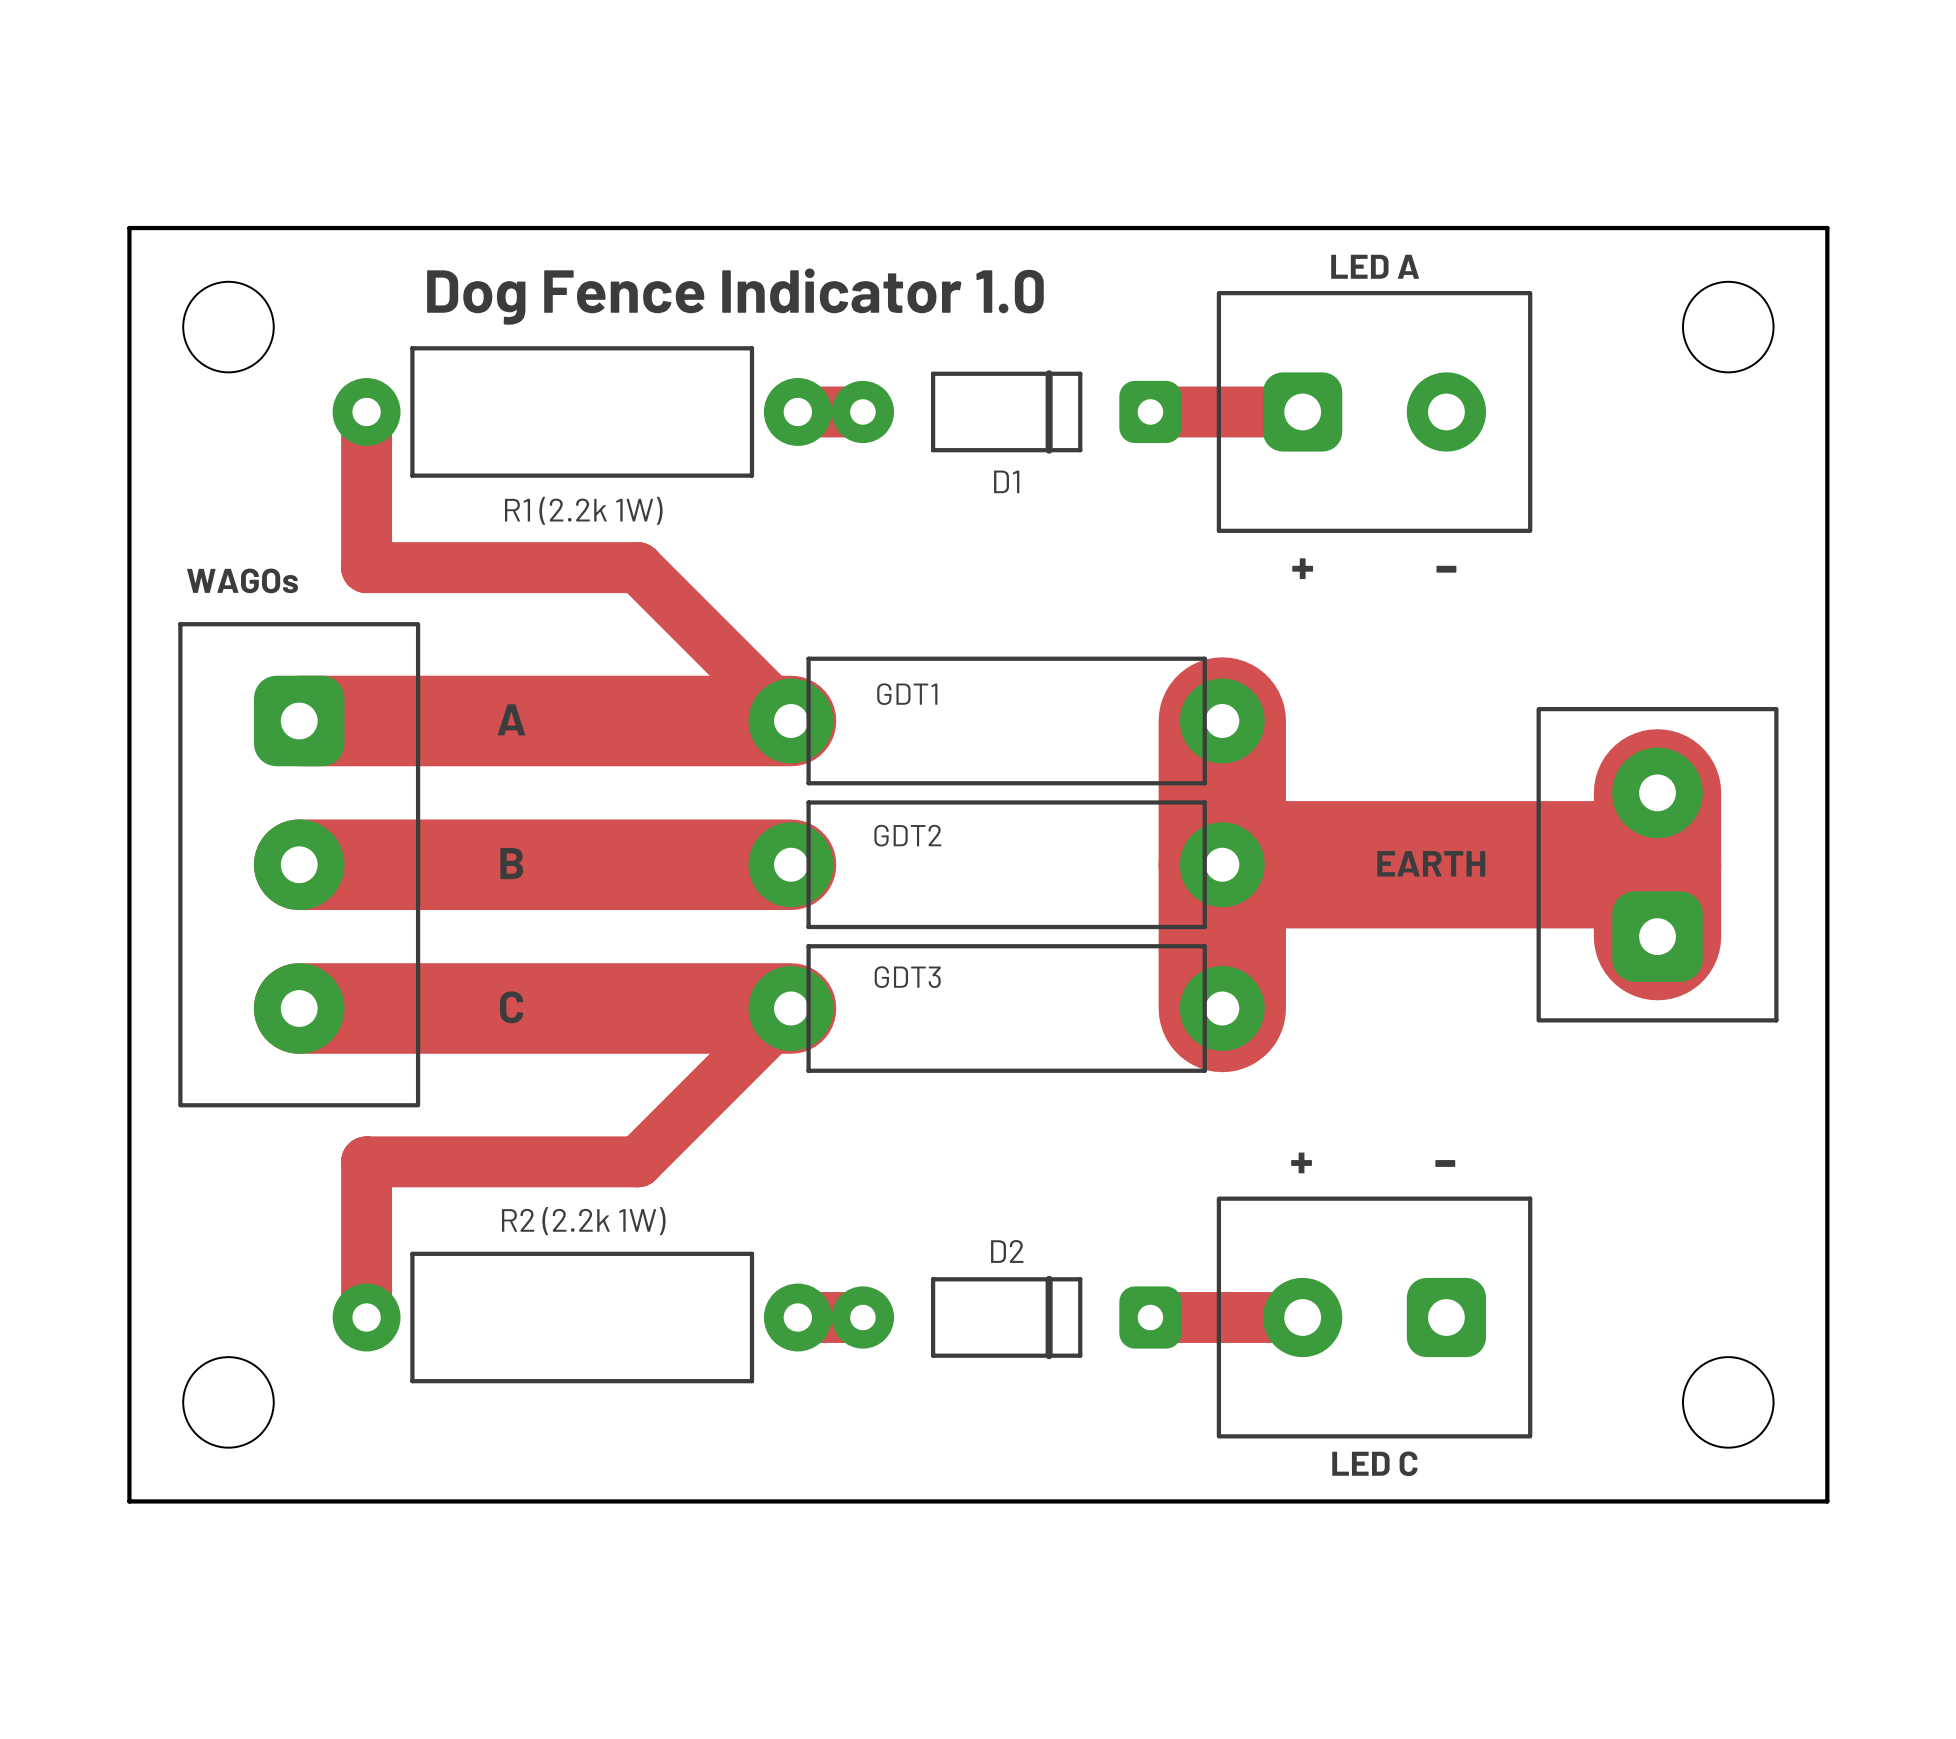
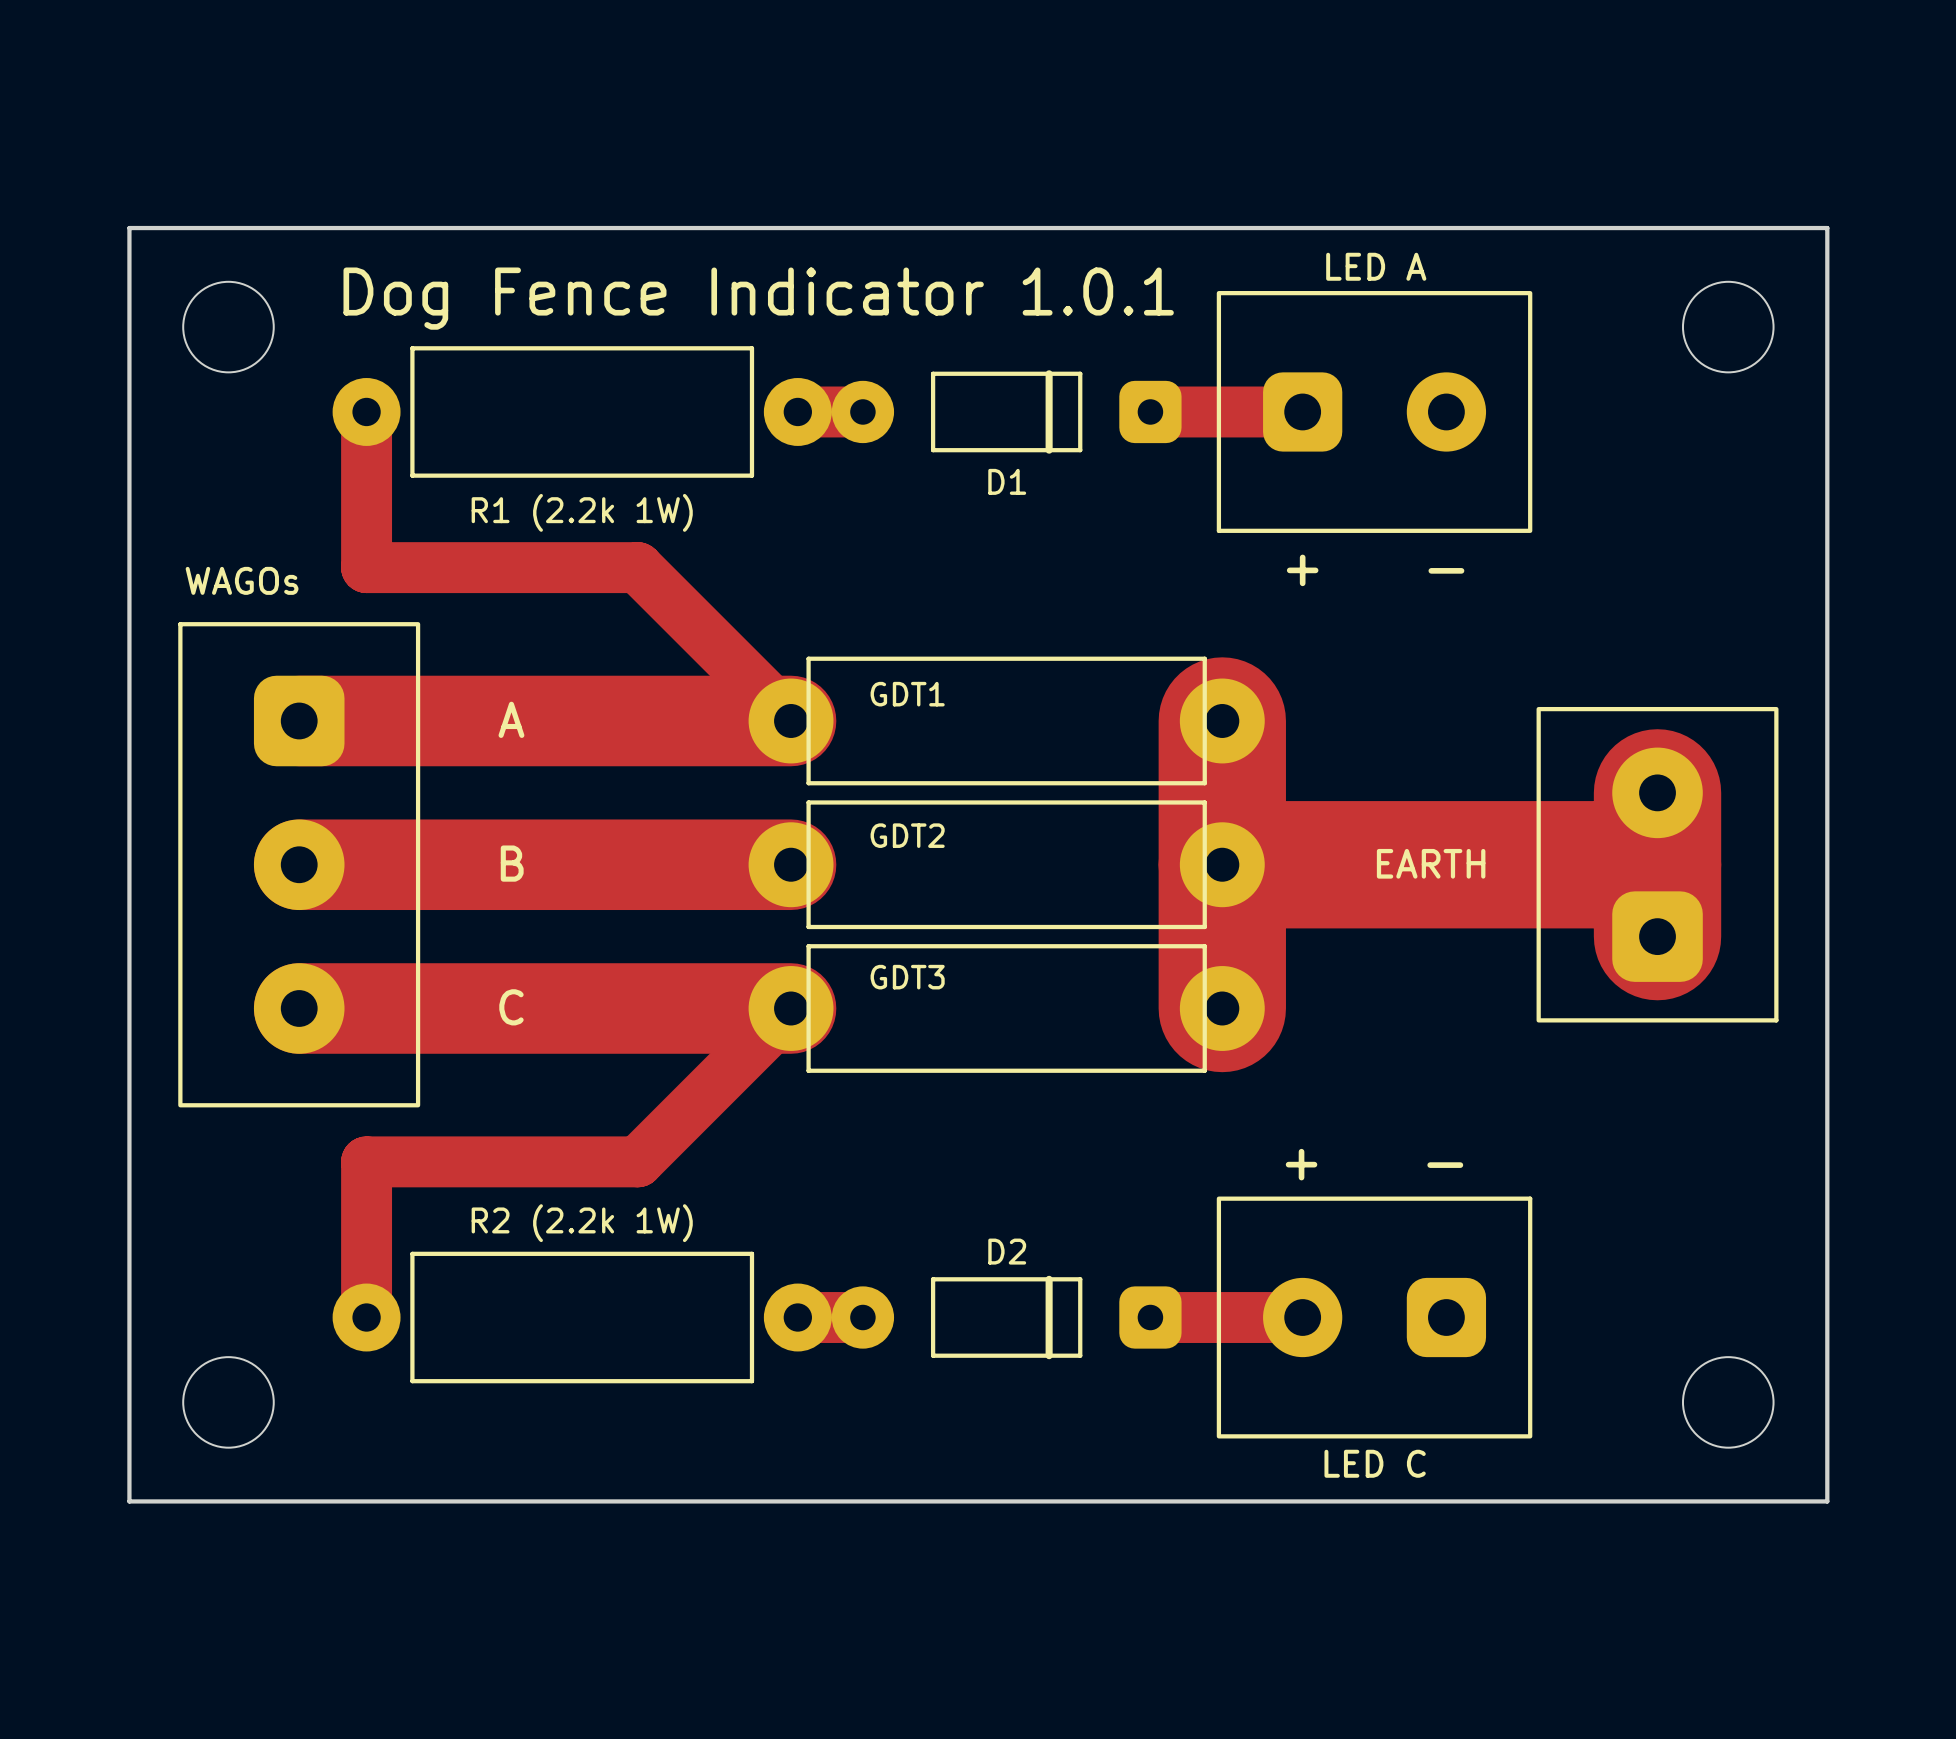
text: Dog Fence Indicator 1.0 (735, 296) -> Dog Fence Indicator 1.0.1 (758, 298)

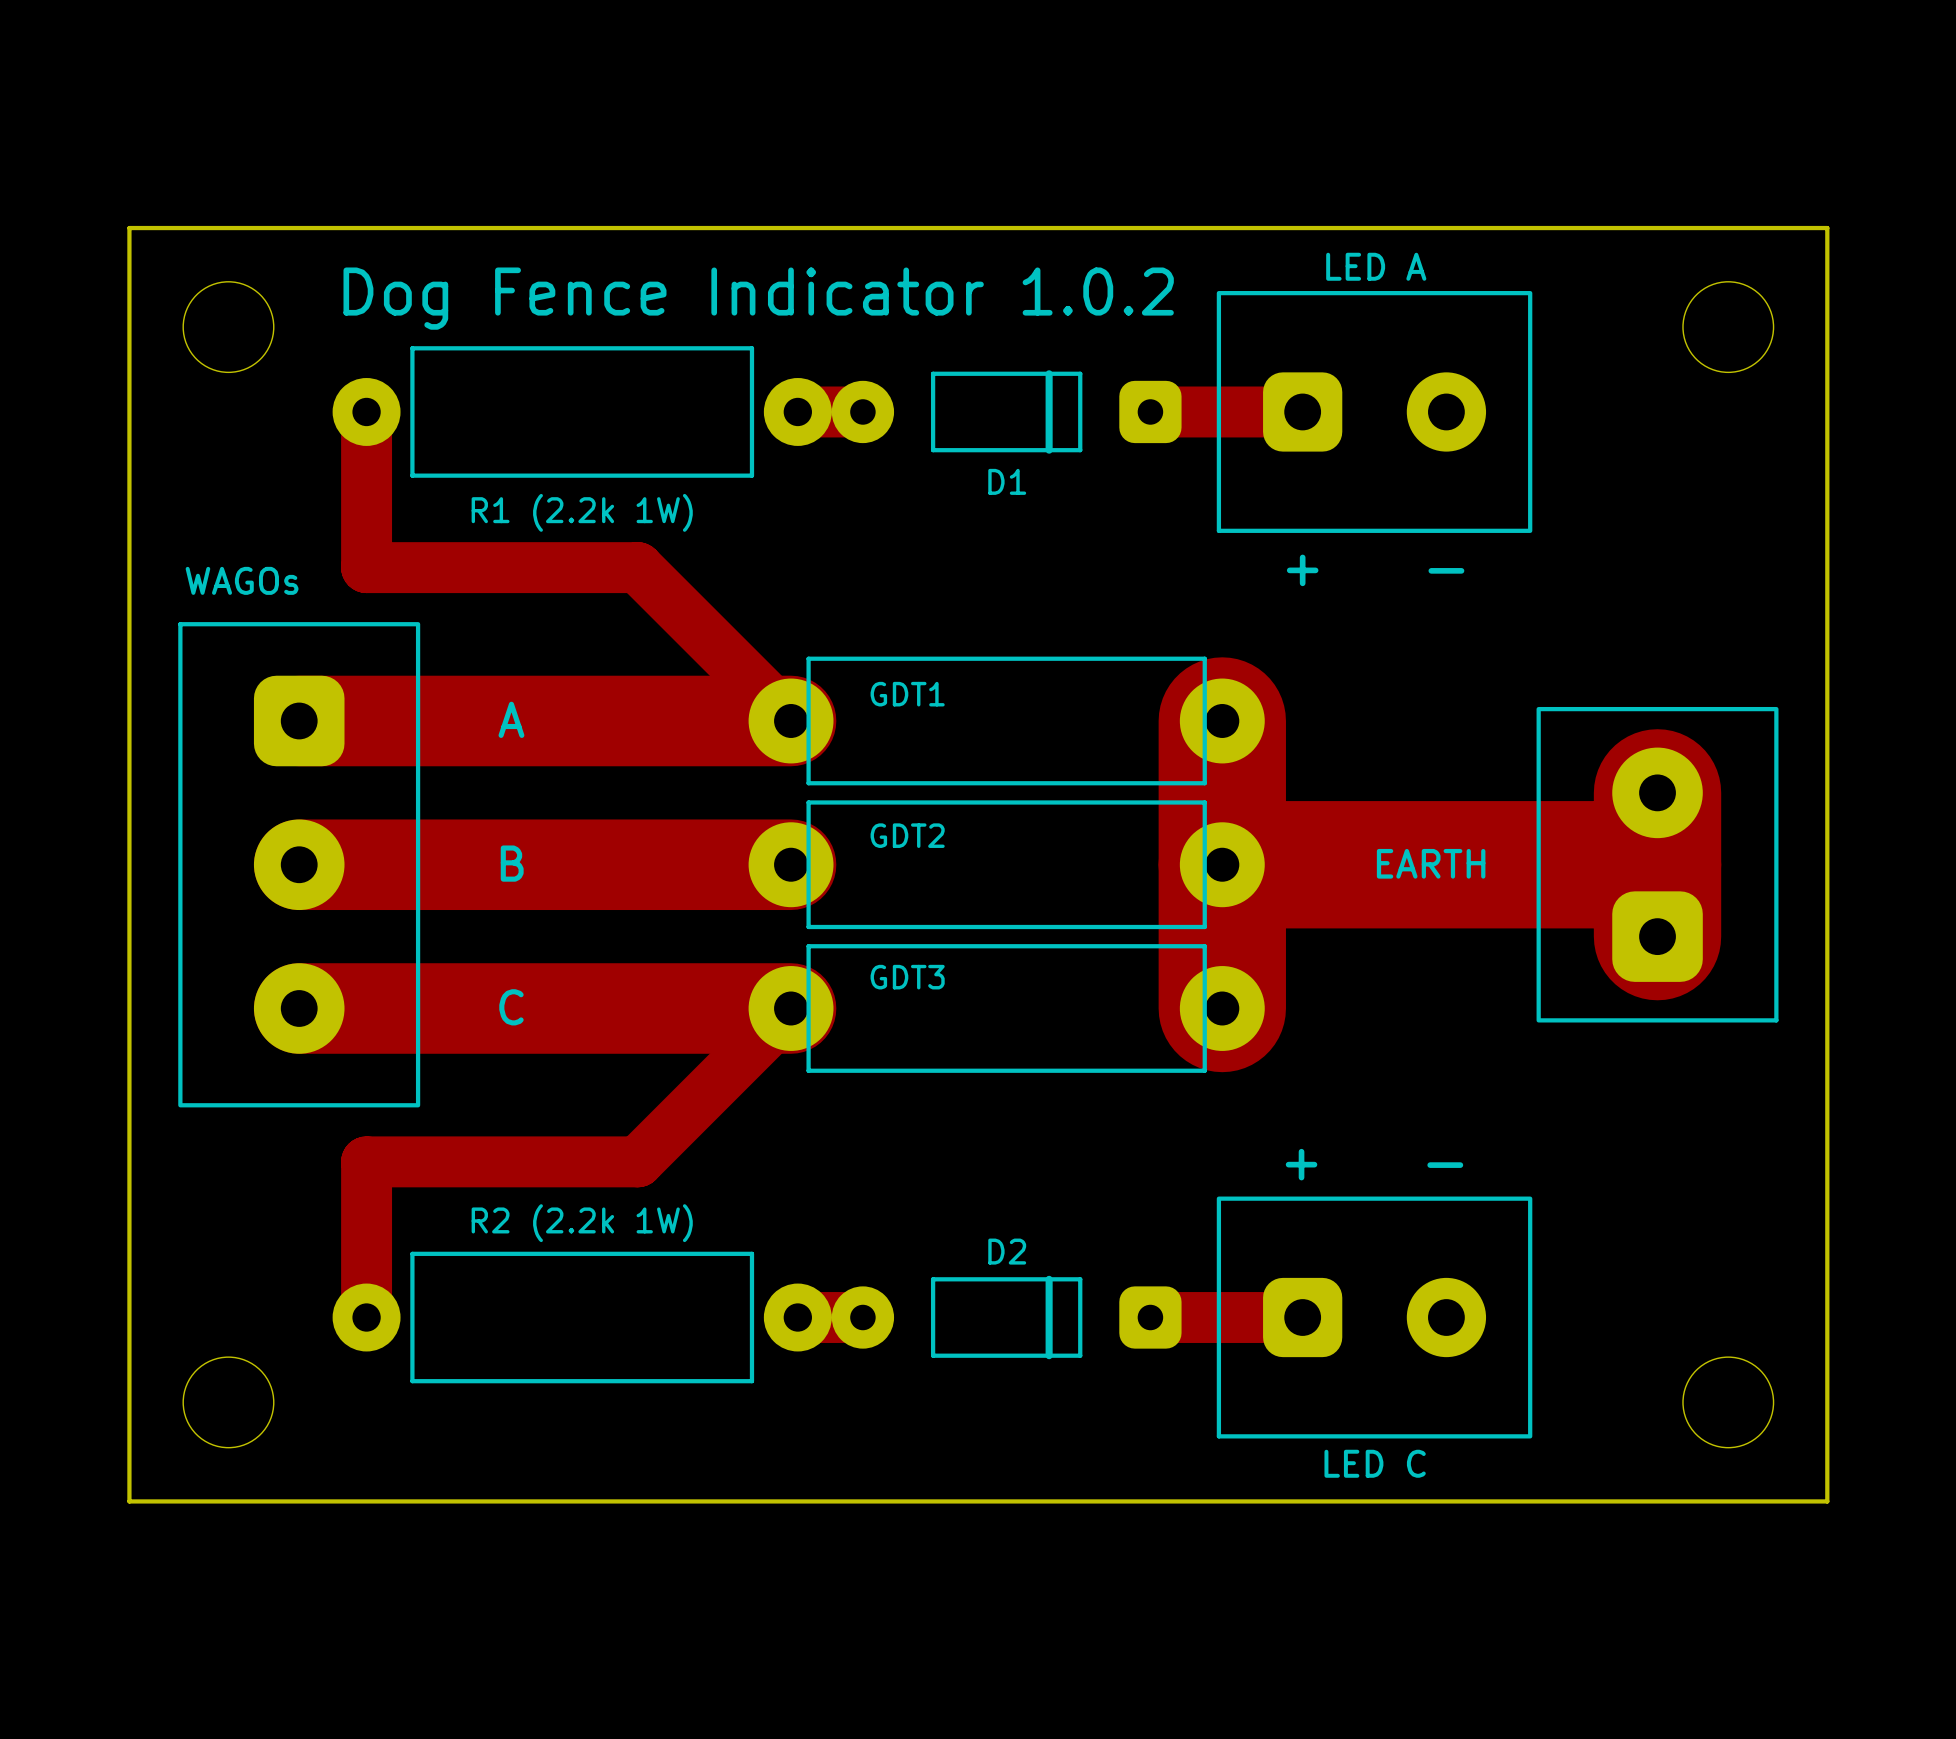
text: Dog Fence Indicator 1.0.1 (758, 298) -> Dog Fence Indicator 1.0.2 (758, 298)
part rotation: 0° (1374, 1317) -> 180° (1374, 1317)

